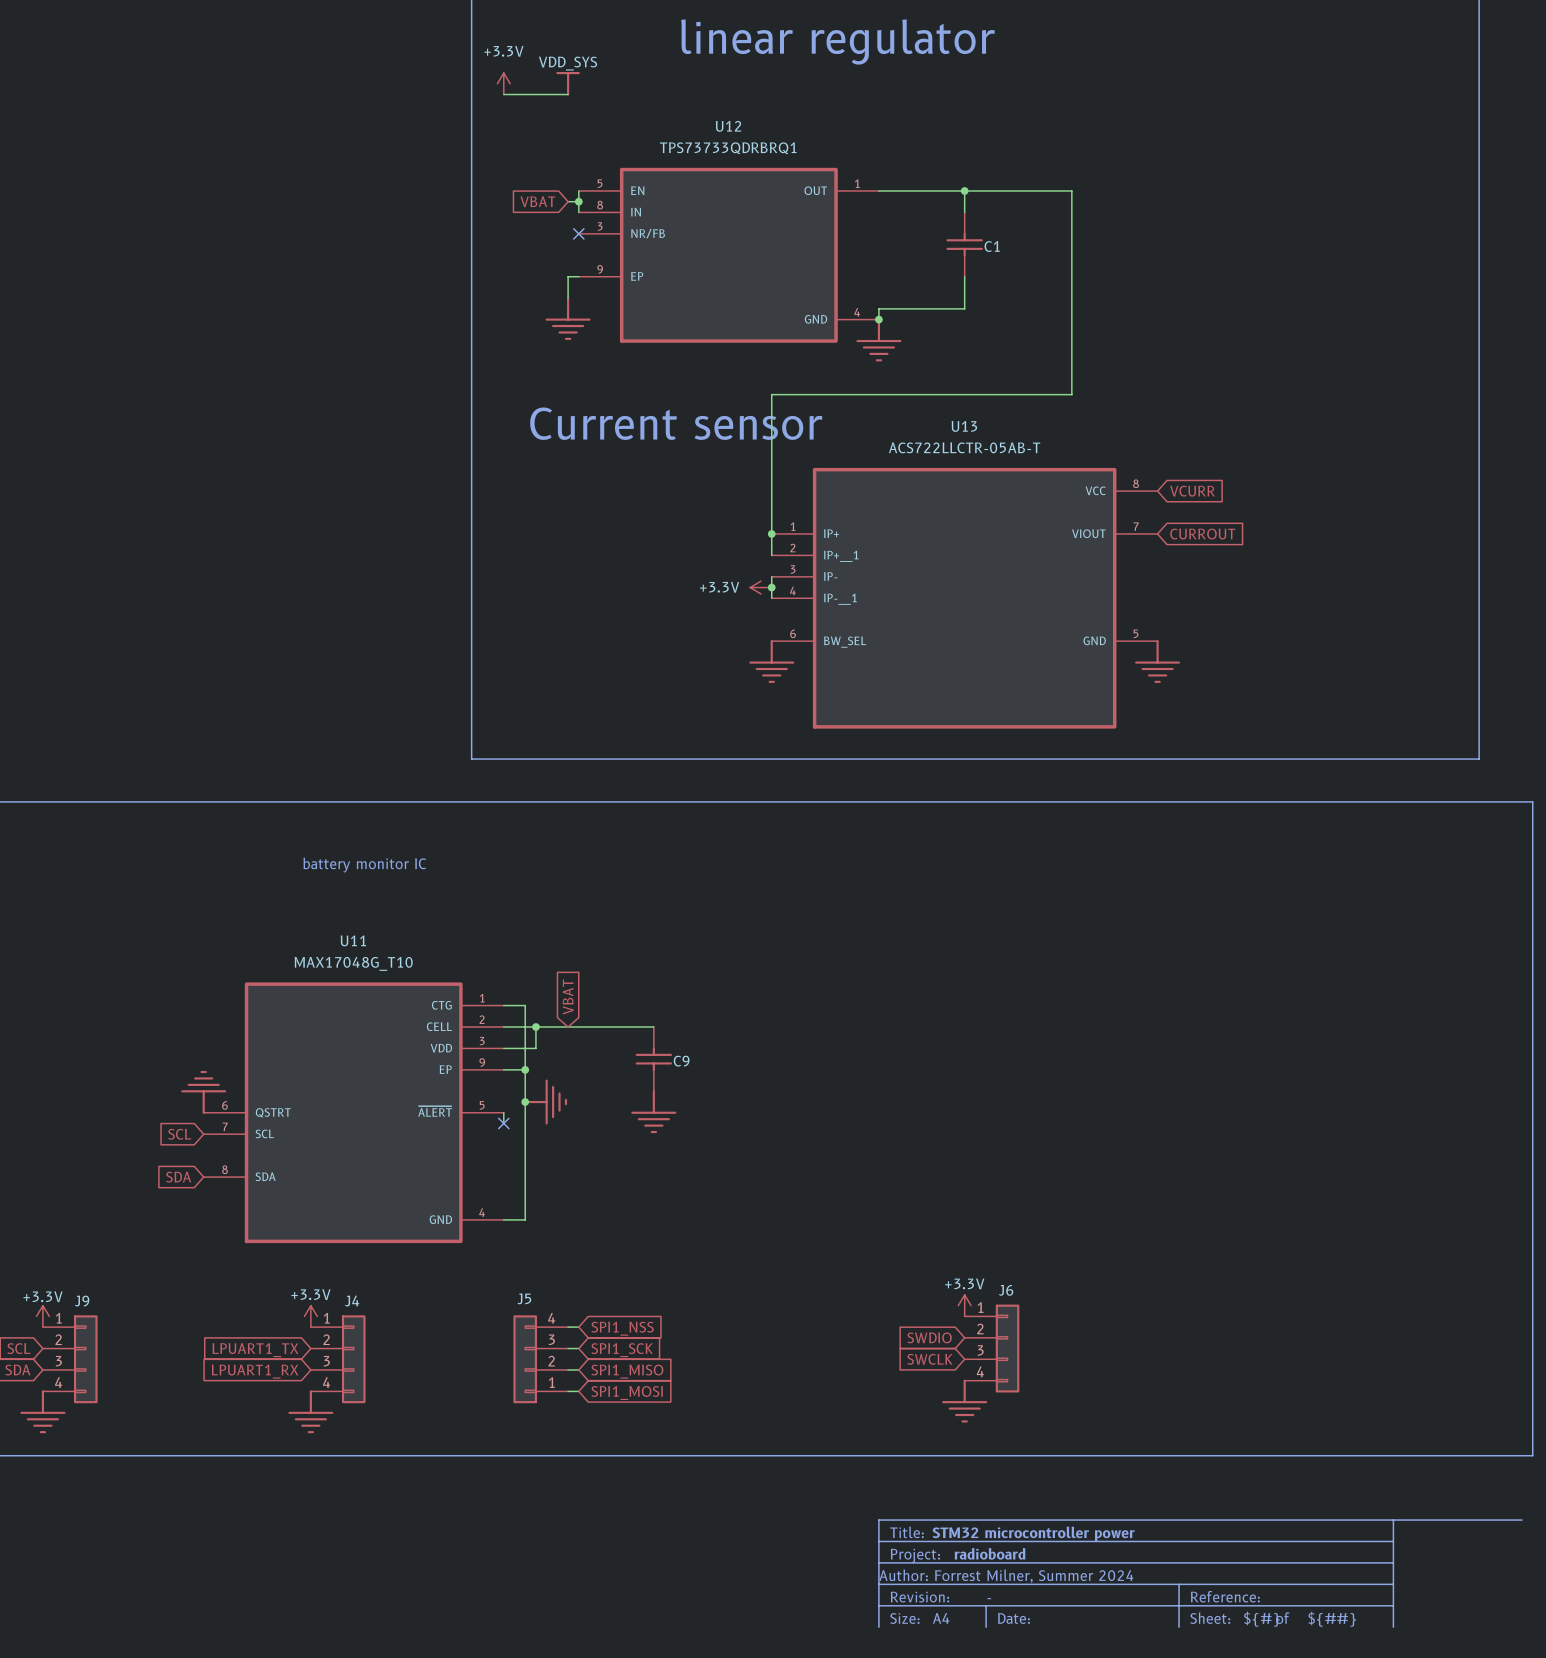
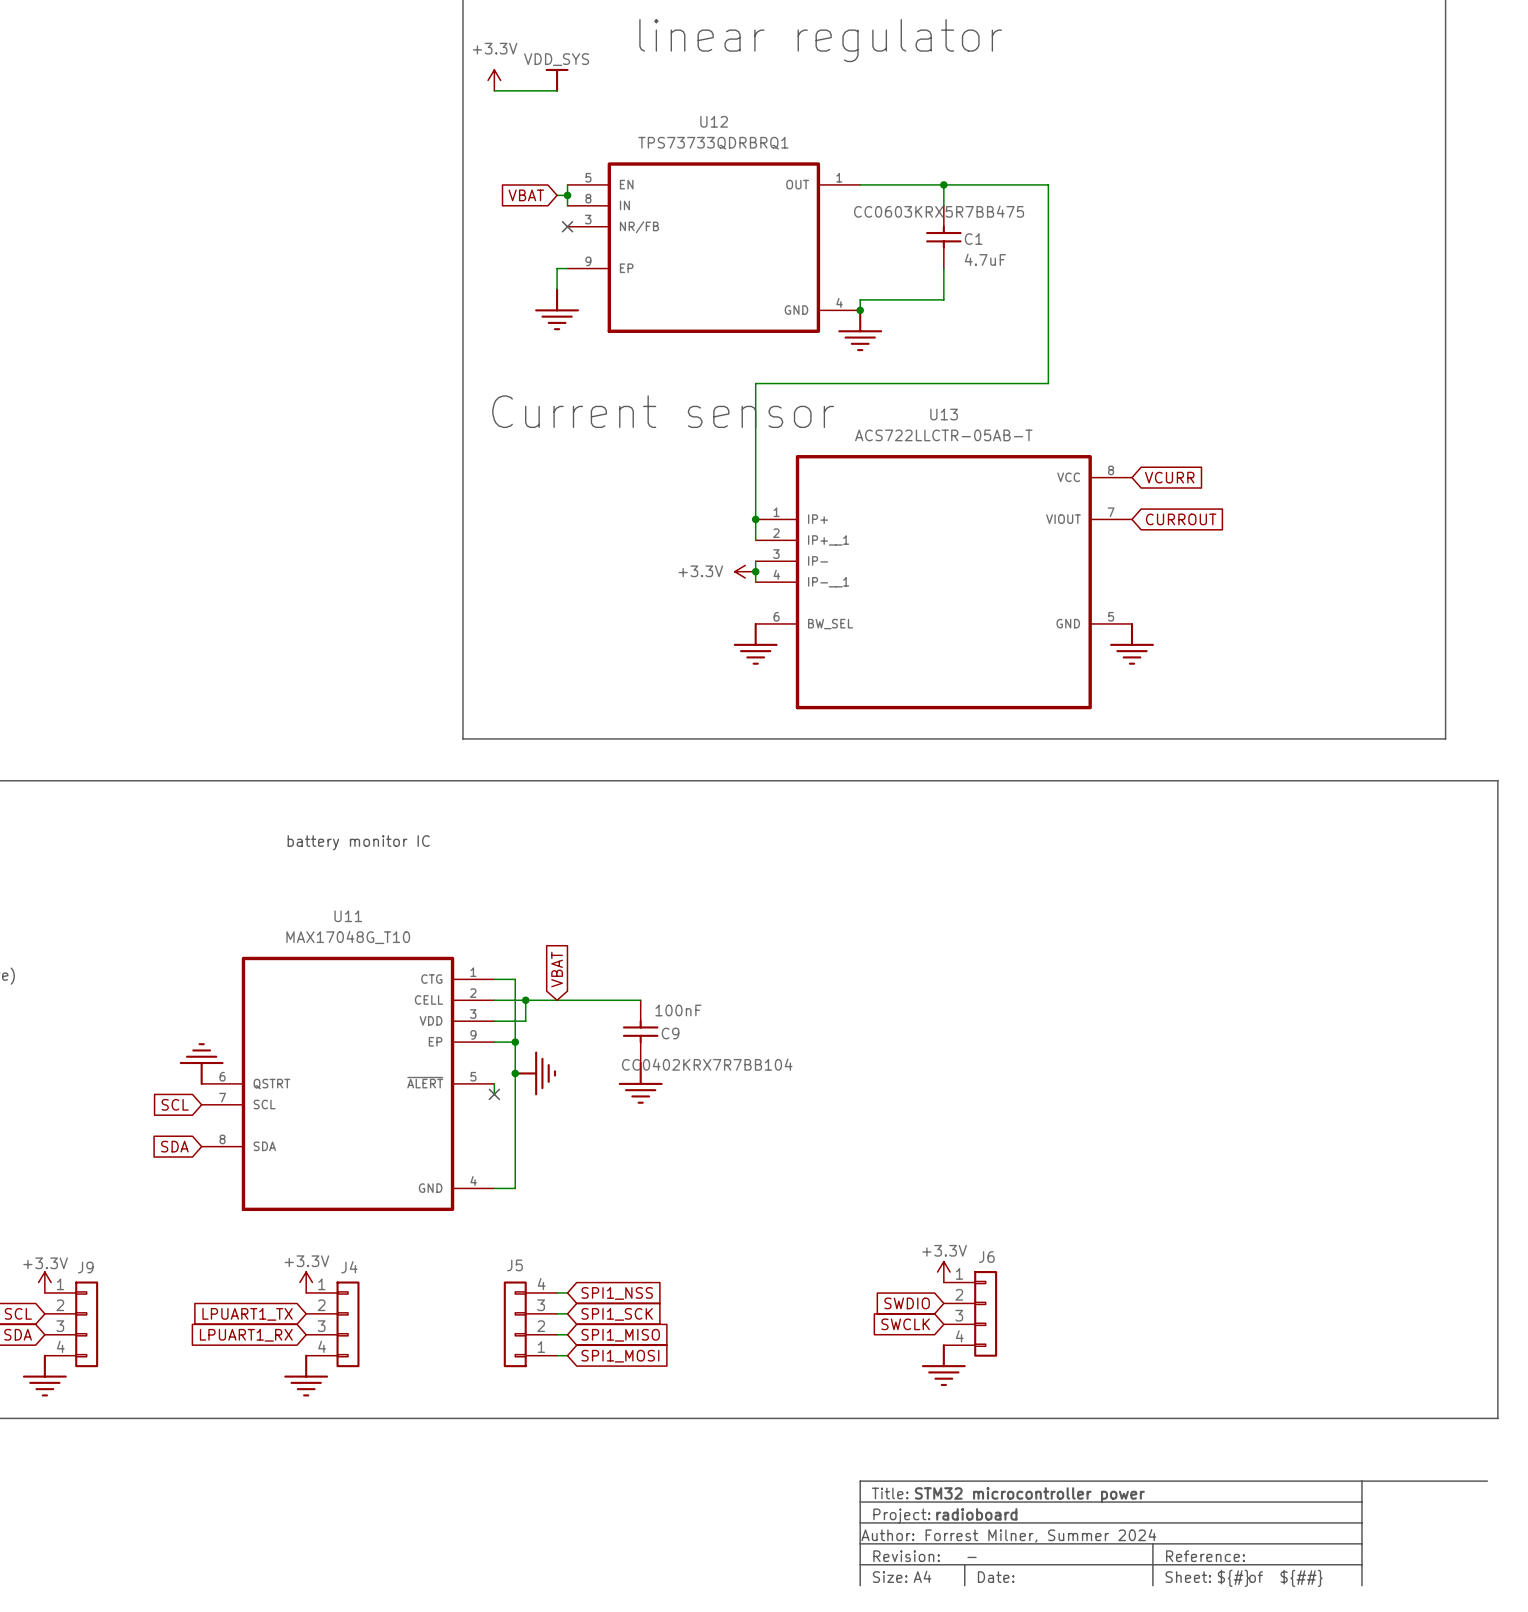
C1 text: none -> CC0603KRX5R7BB475 (939, 211)
C1 text: none -> 4.7uF (985, 259)
C9 text: none -> 100nF (678, 1010)
C9 text: none -> CC0402KRX7R7BB104 (707, 1064)

